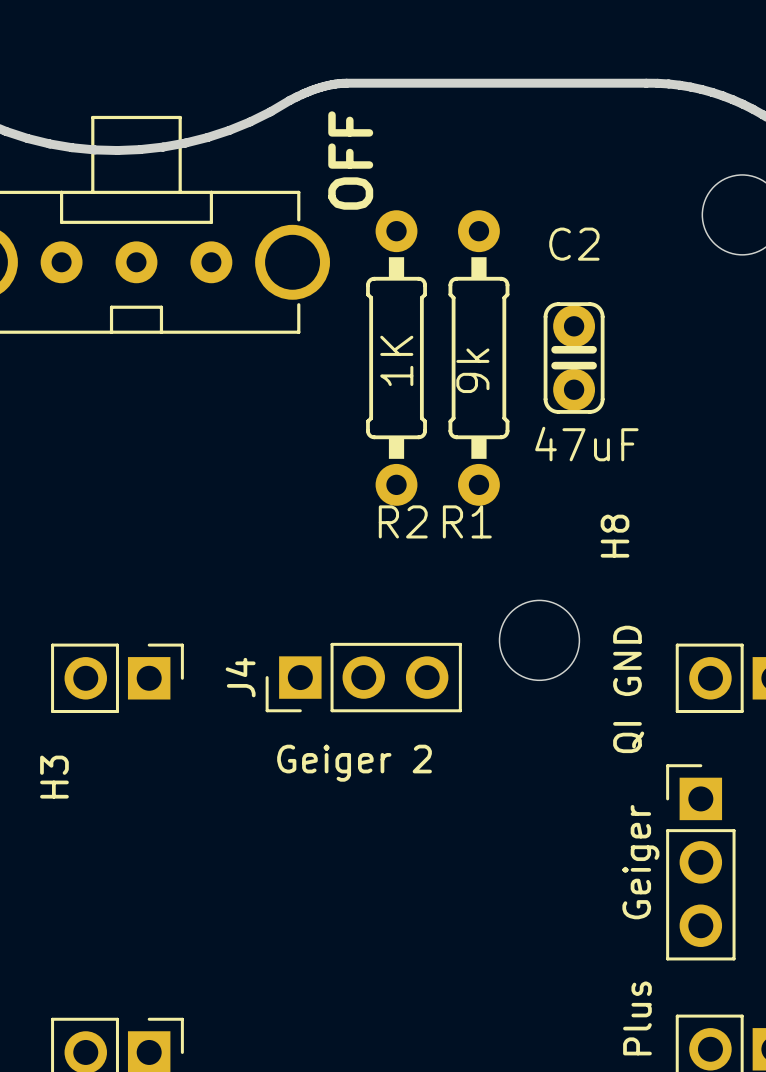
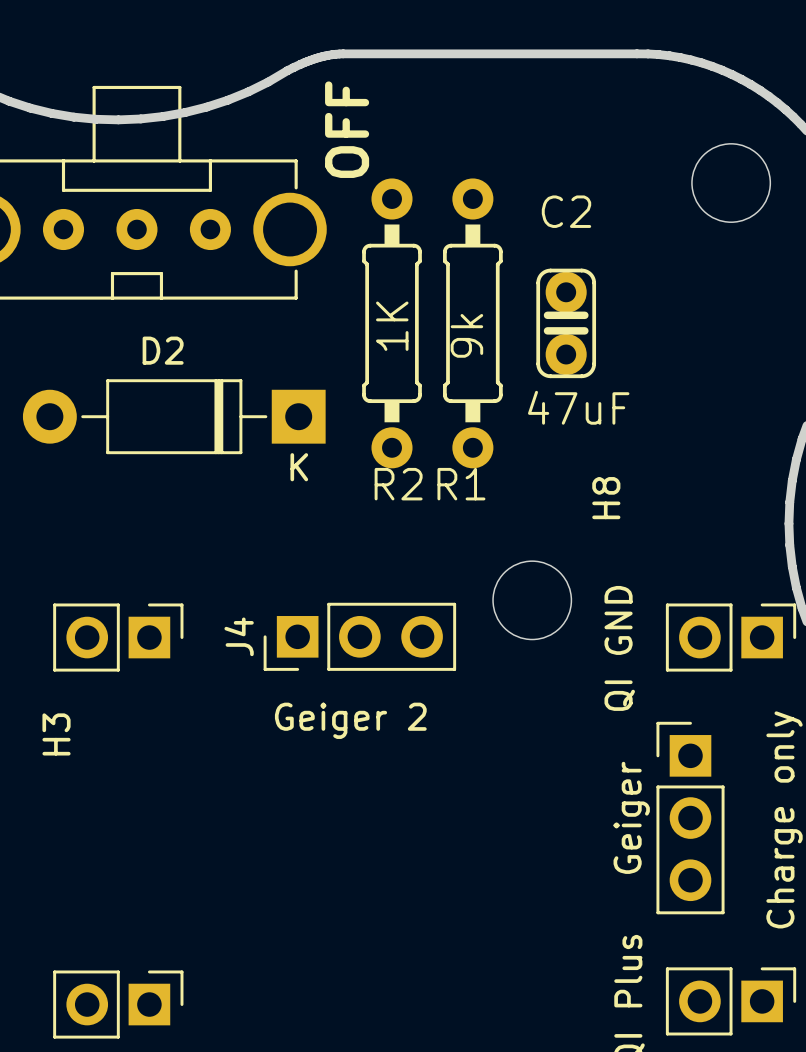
D2: none -> (174, 416)

